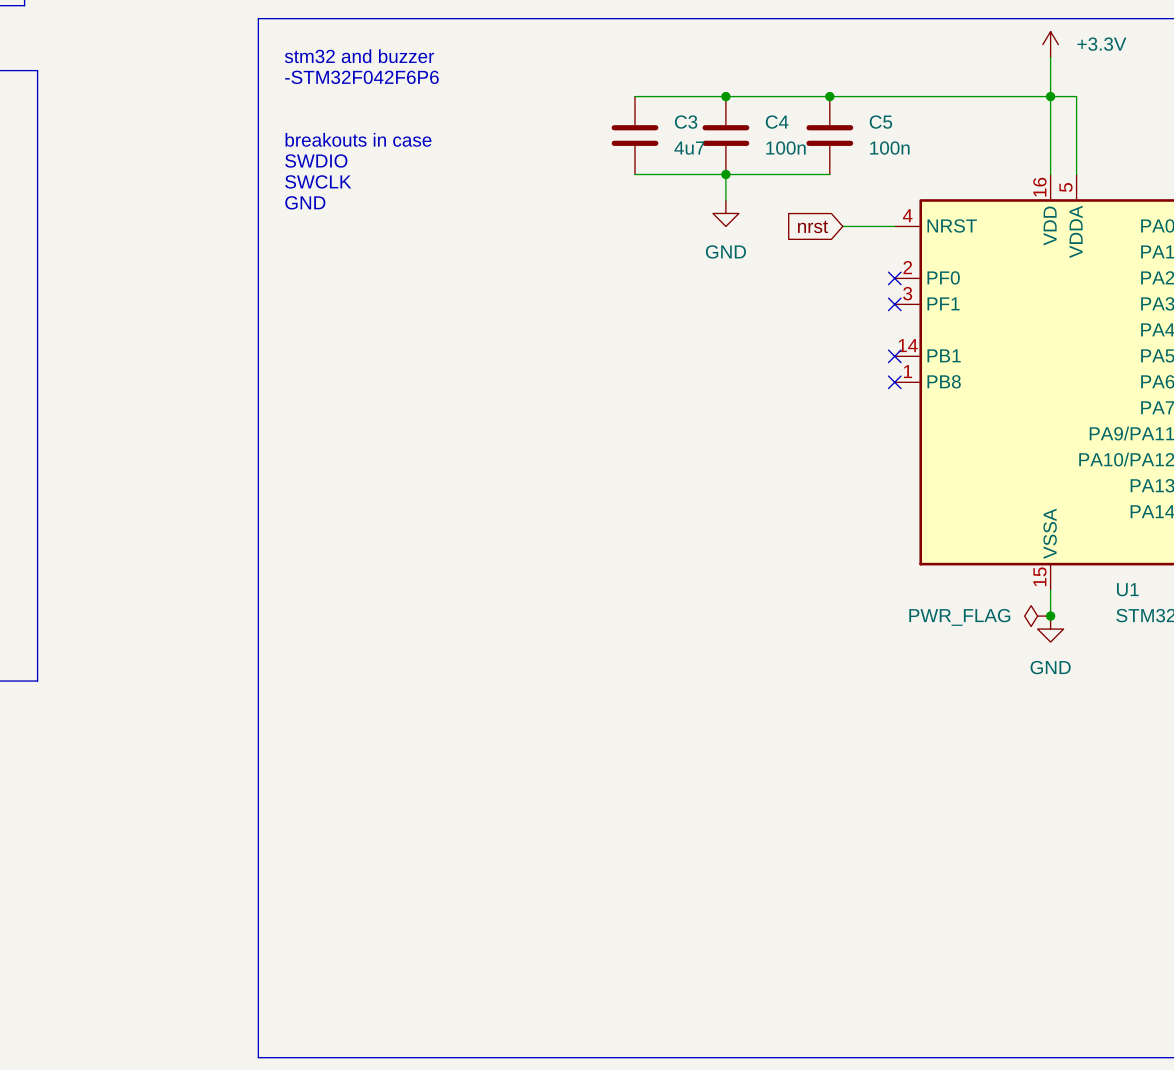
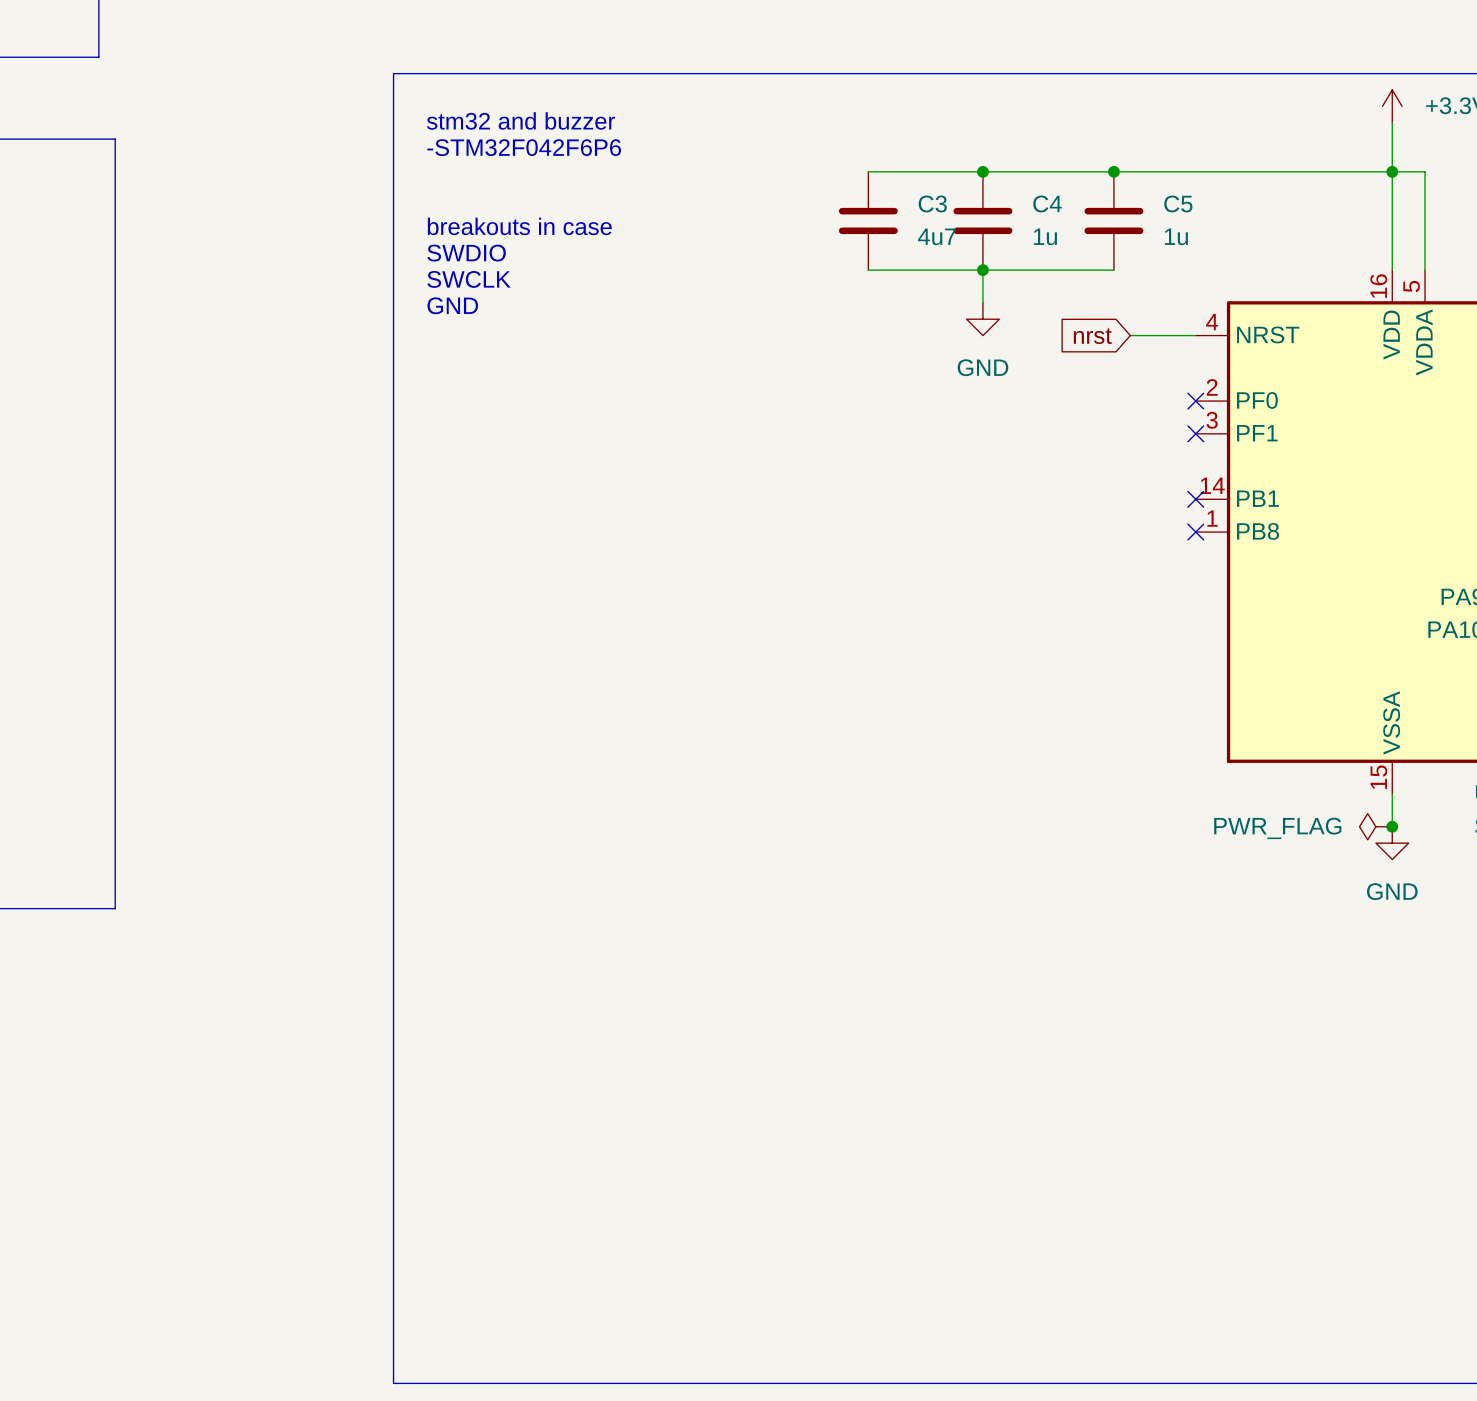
C4 value: 100n (785, 148) -> 1u (1045, 236)
C5 value: 100n (889, 148) -> 1u (1176, 236)

